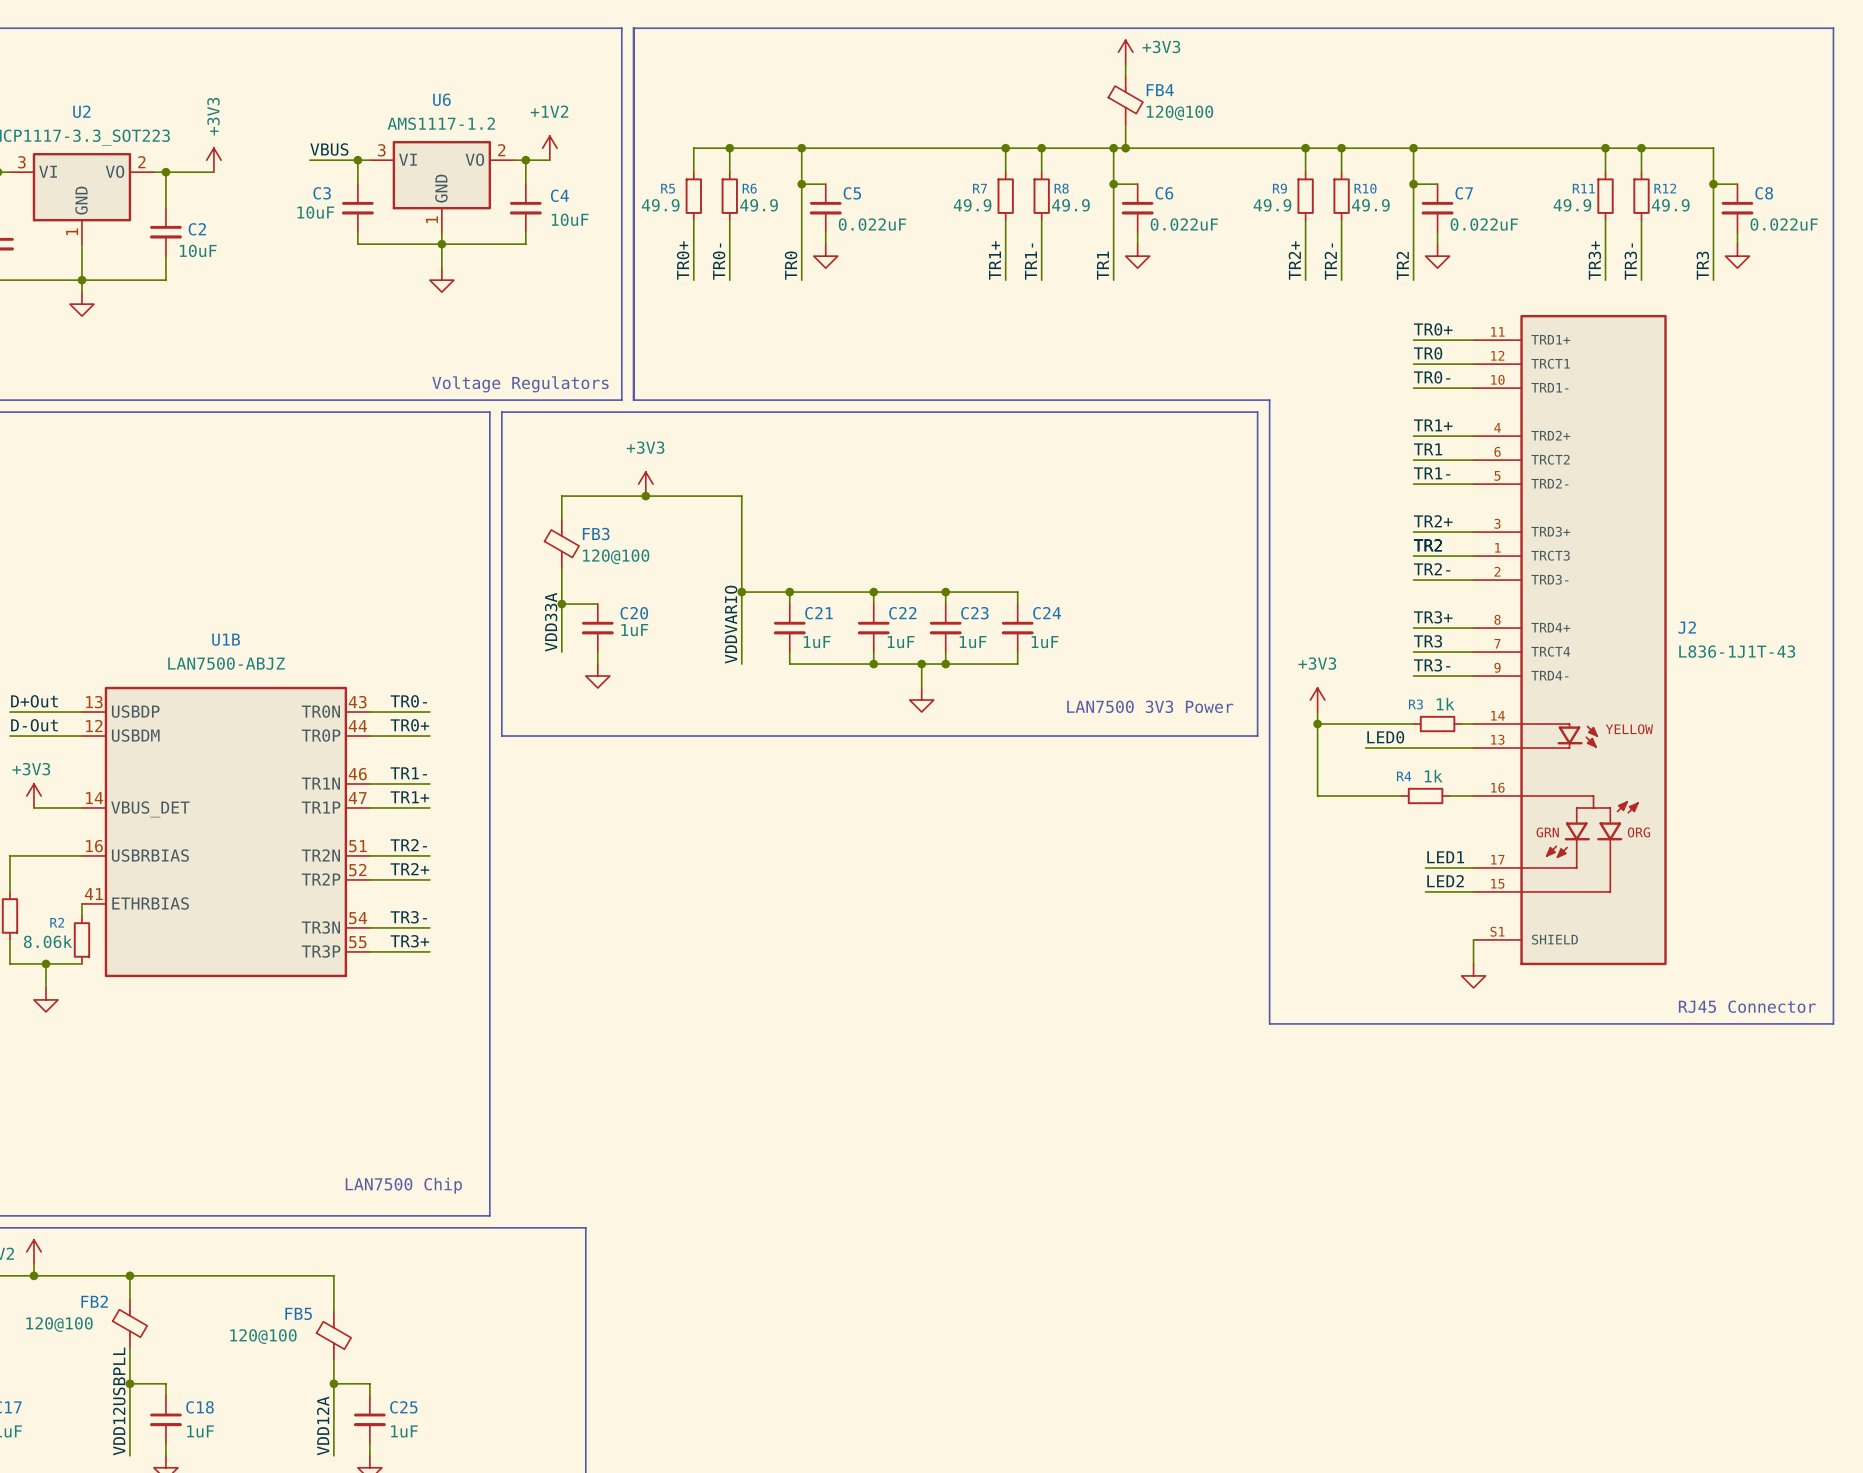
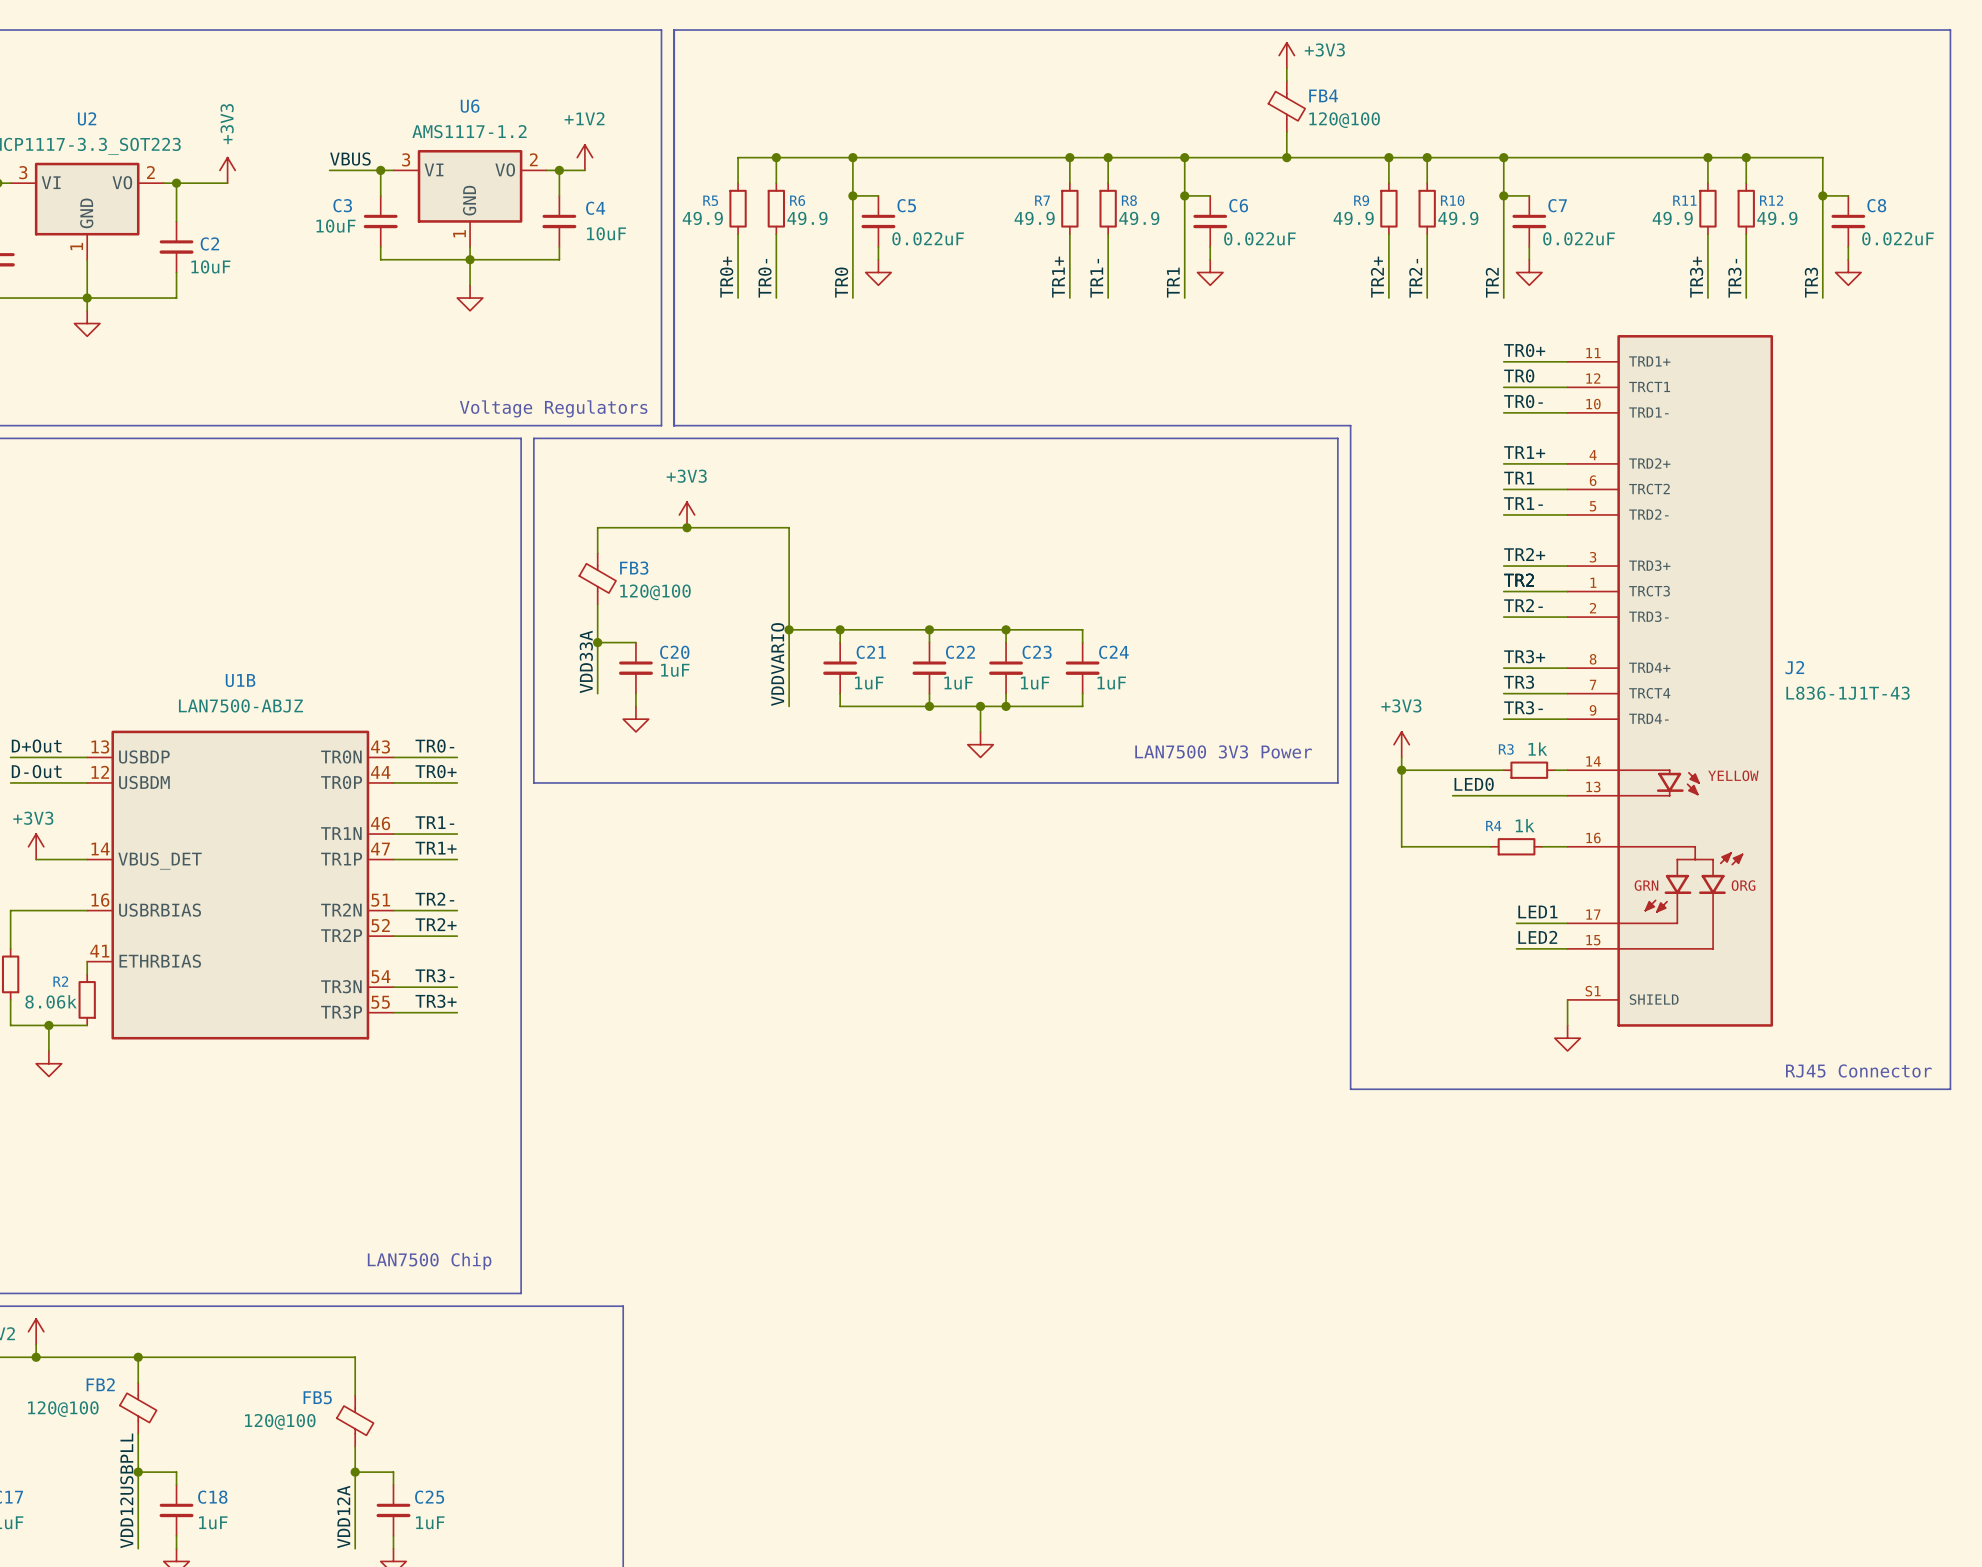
power symbol position: +3V3 (1125, 52) -> +3V3 (1286, 55)
wire: (1125, 64) (1125, 76) -> (1286, 68) (1286, 81)
FB4 position: (1125, 100) -> (1286, 106)
wire: (1125, 124) (1125, 148) -> (1286, 132) (1286, 157)
junction: (1125, 148) -> none
junction: none -> (1286, 157)

